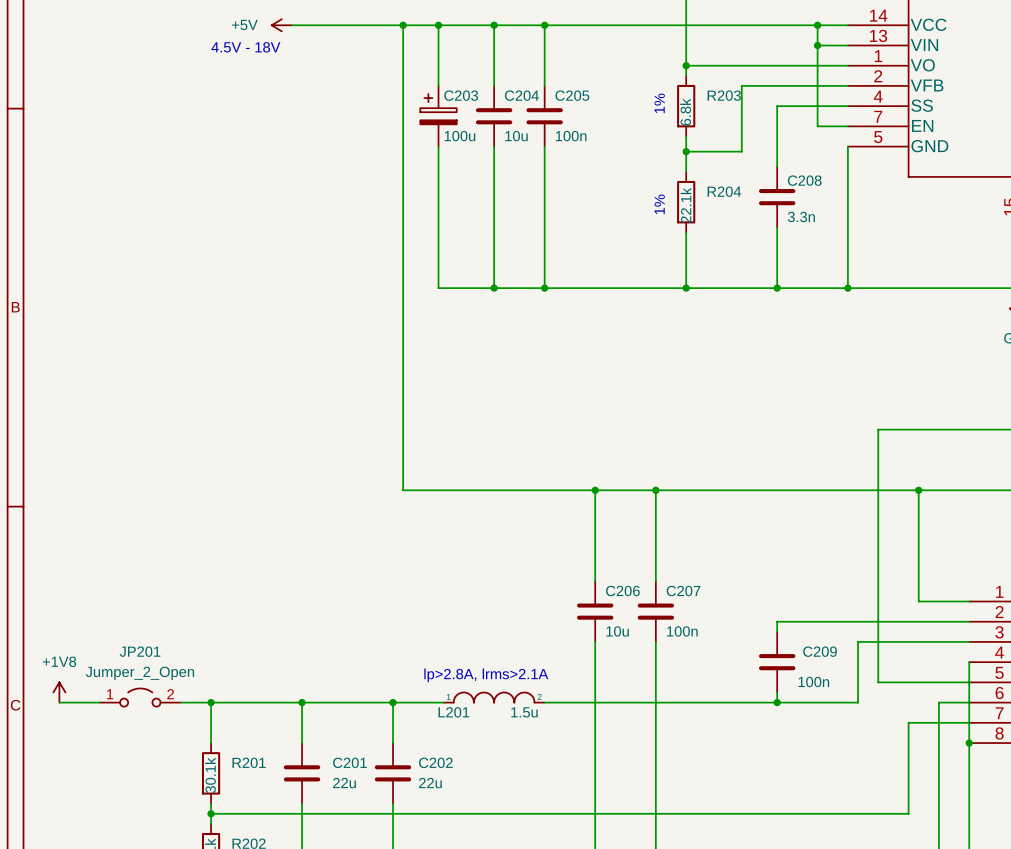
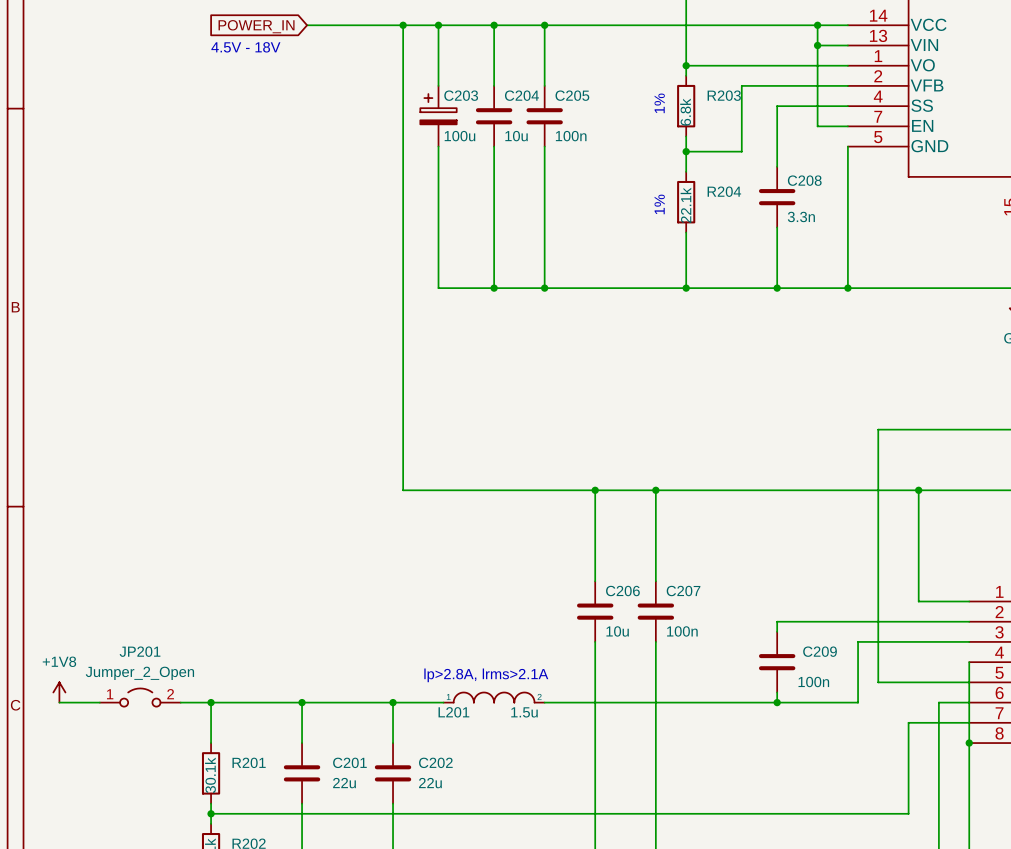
power symbol: +5V (281, 25) -> none
wire: (291, 25) (307, 25) -> none
global label: none -> POWER_IN (256, 26)

